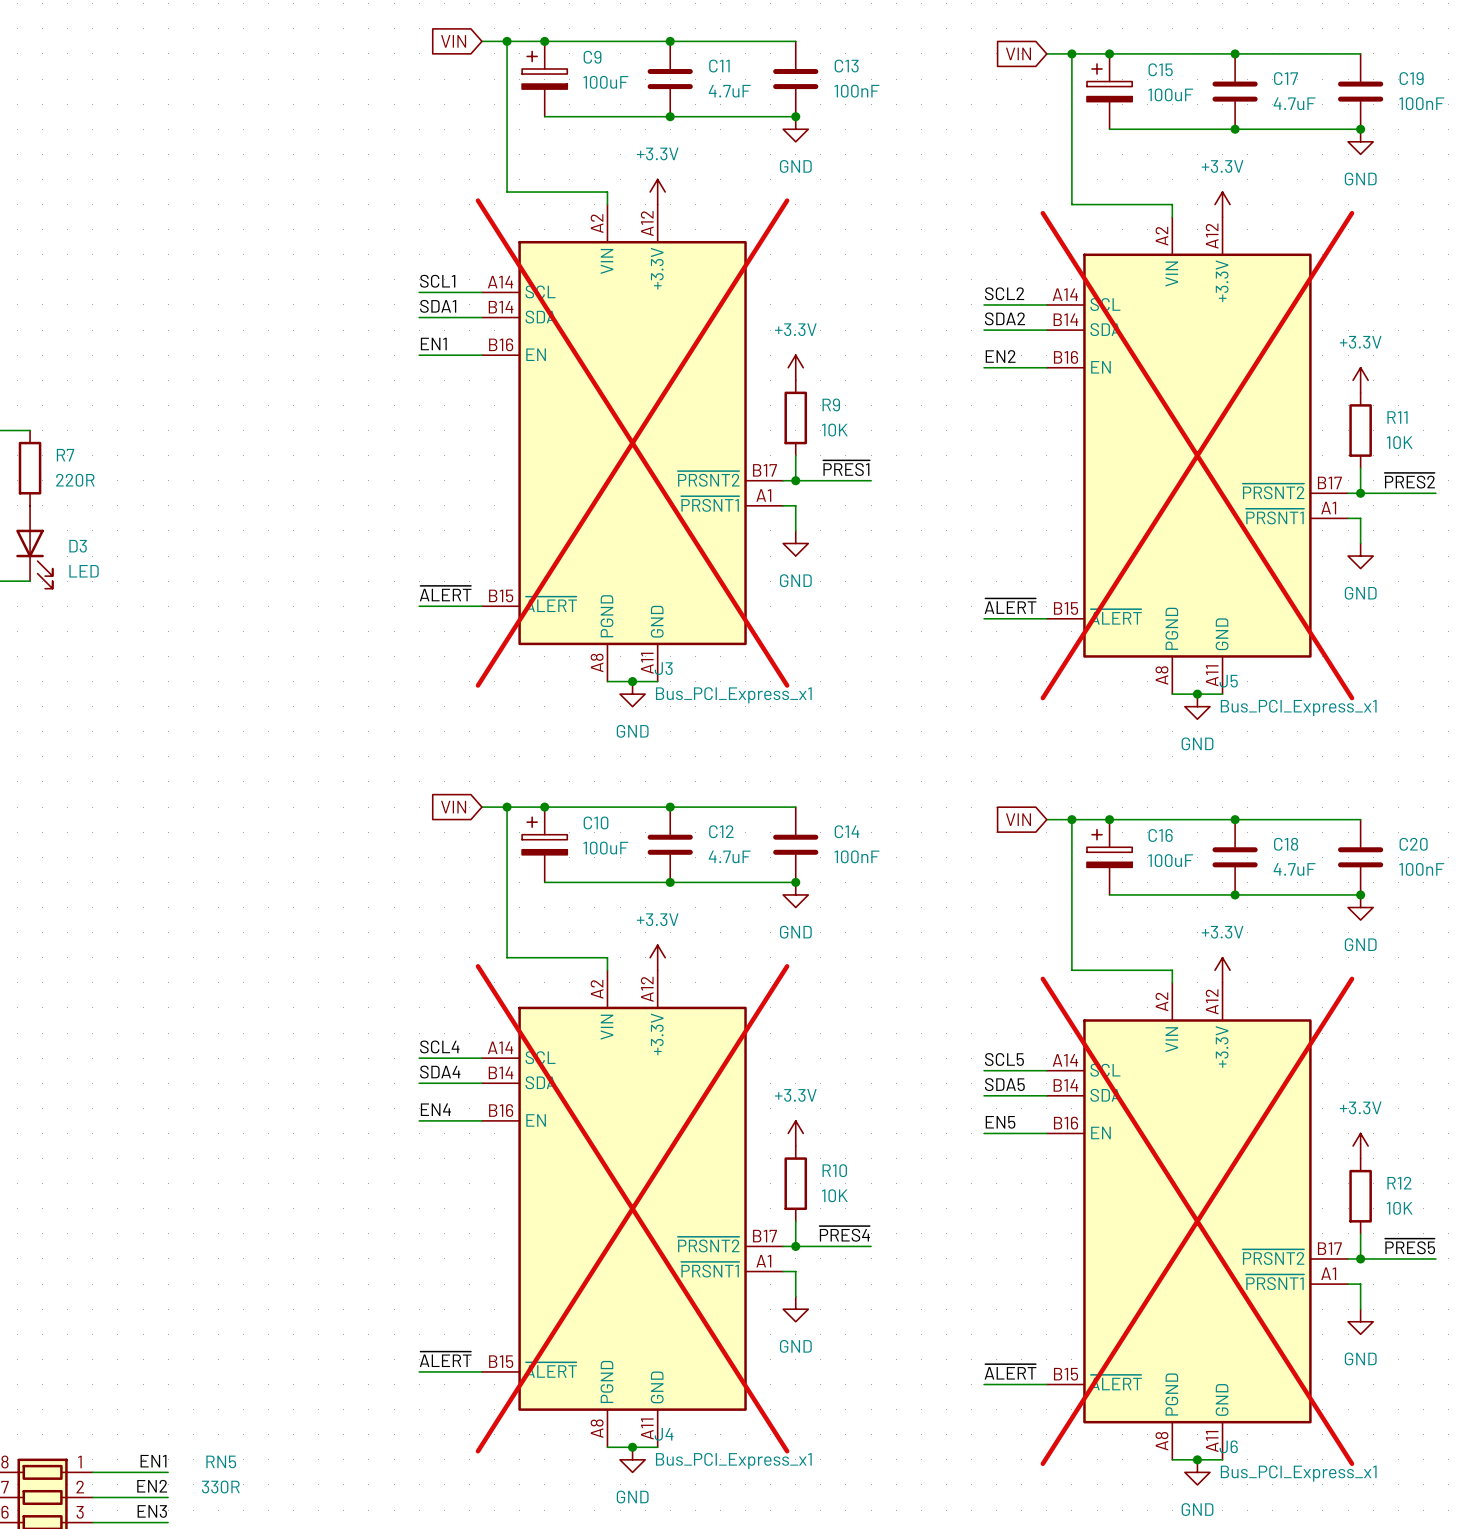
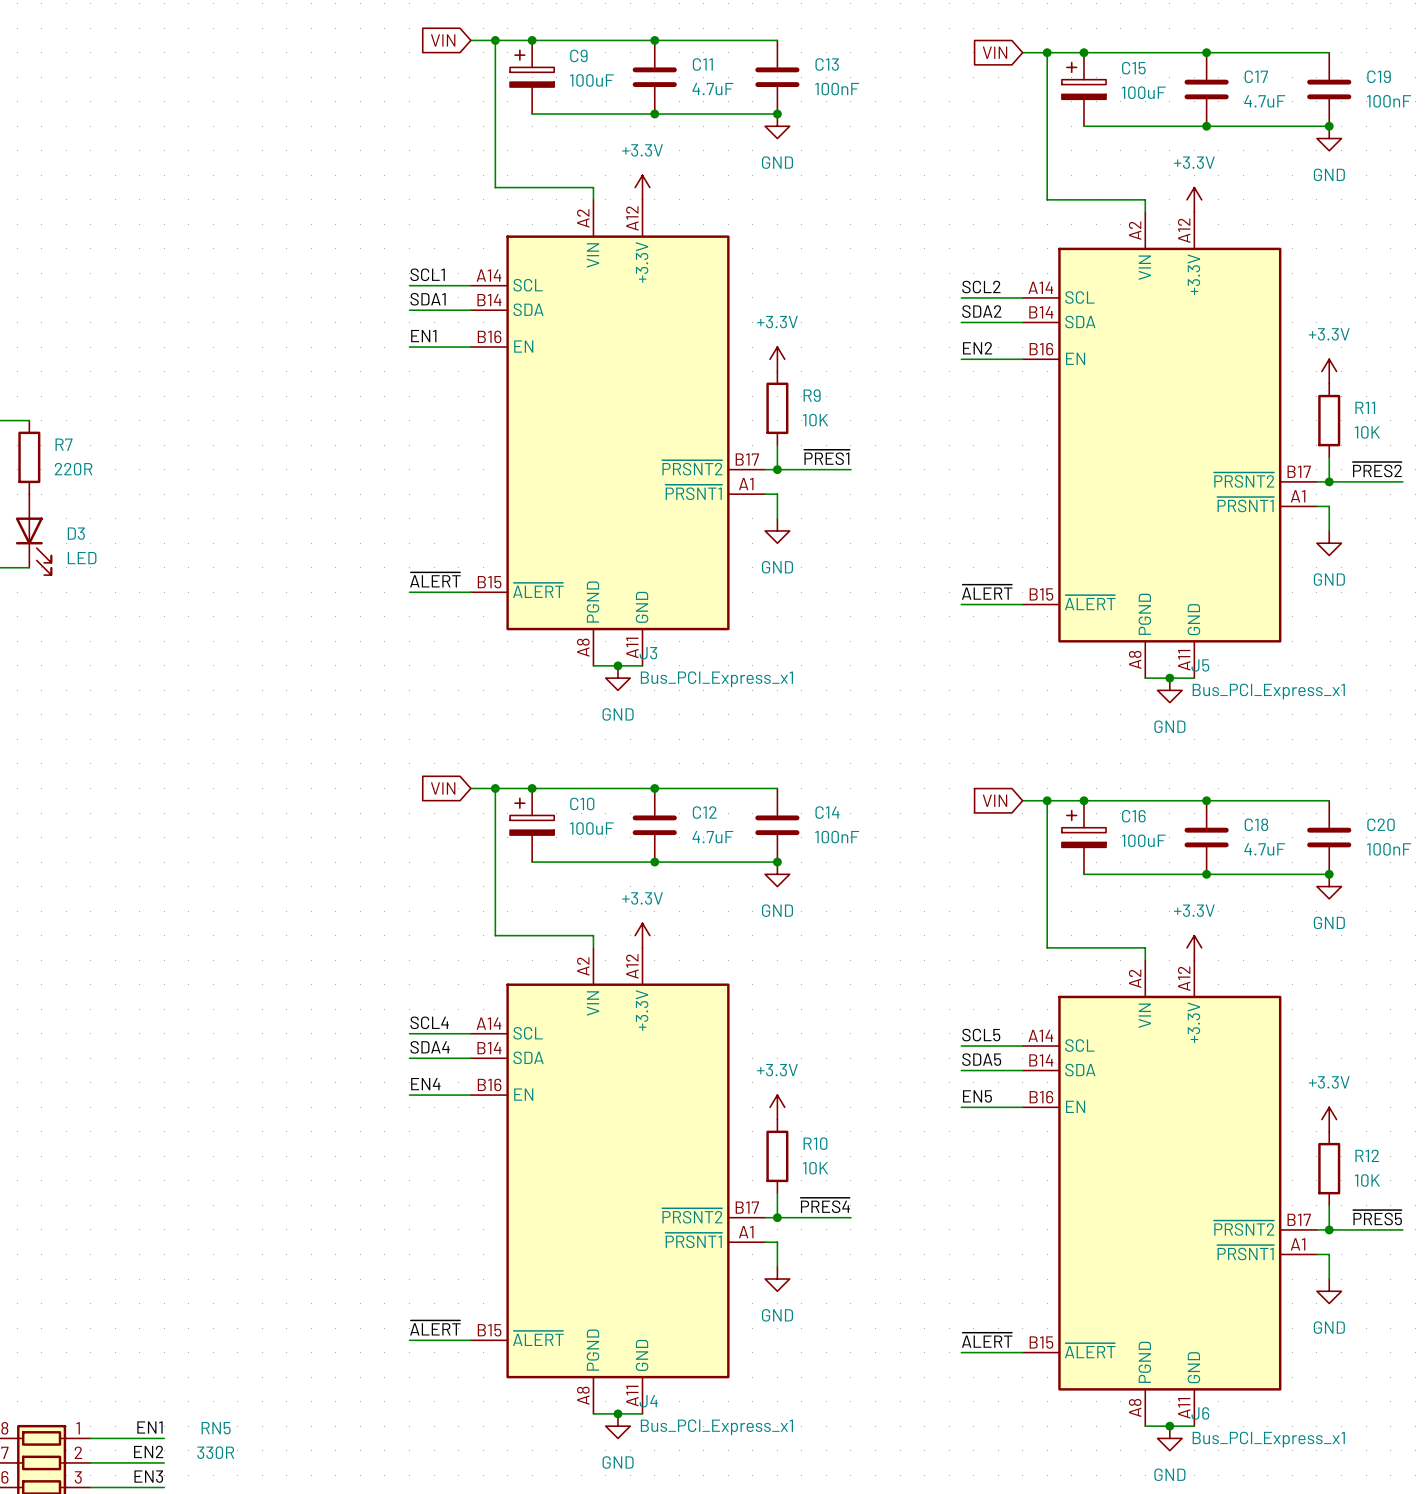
J3 do-not-place cross: (632, 443) -> none
J5 do-not-place cross: (1197, 455) -> none
J4 do-not-place cross: (632, 1208) -> none
J6 do-not-place cross: (1197, 1221) -> none

